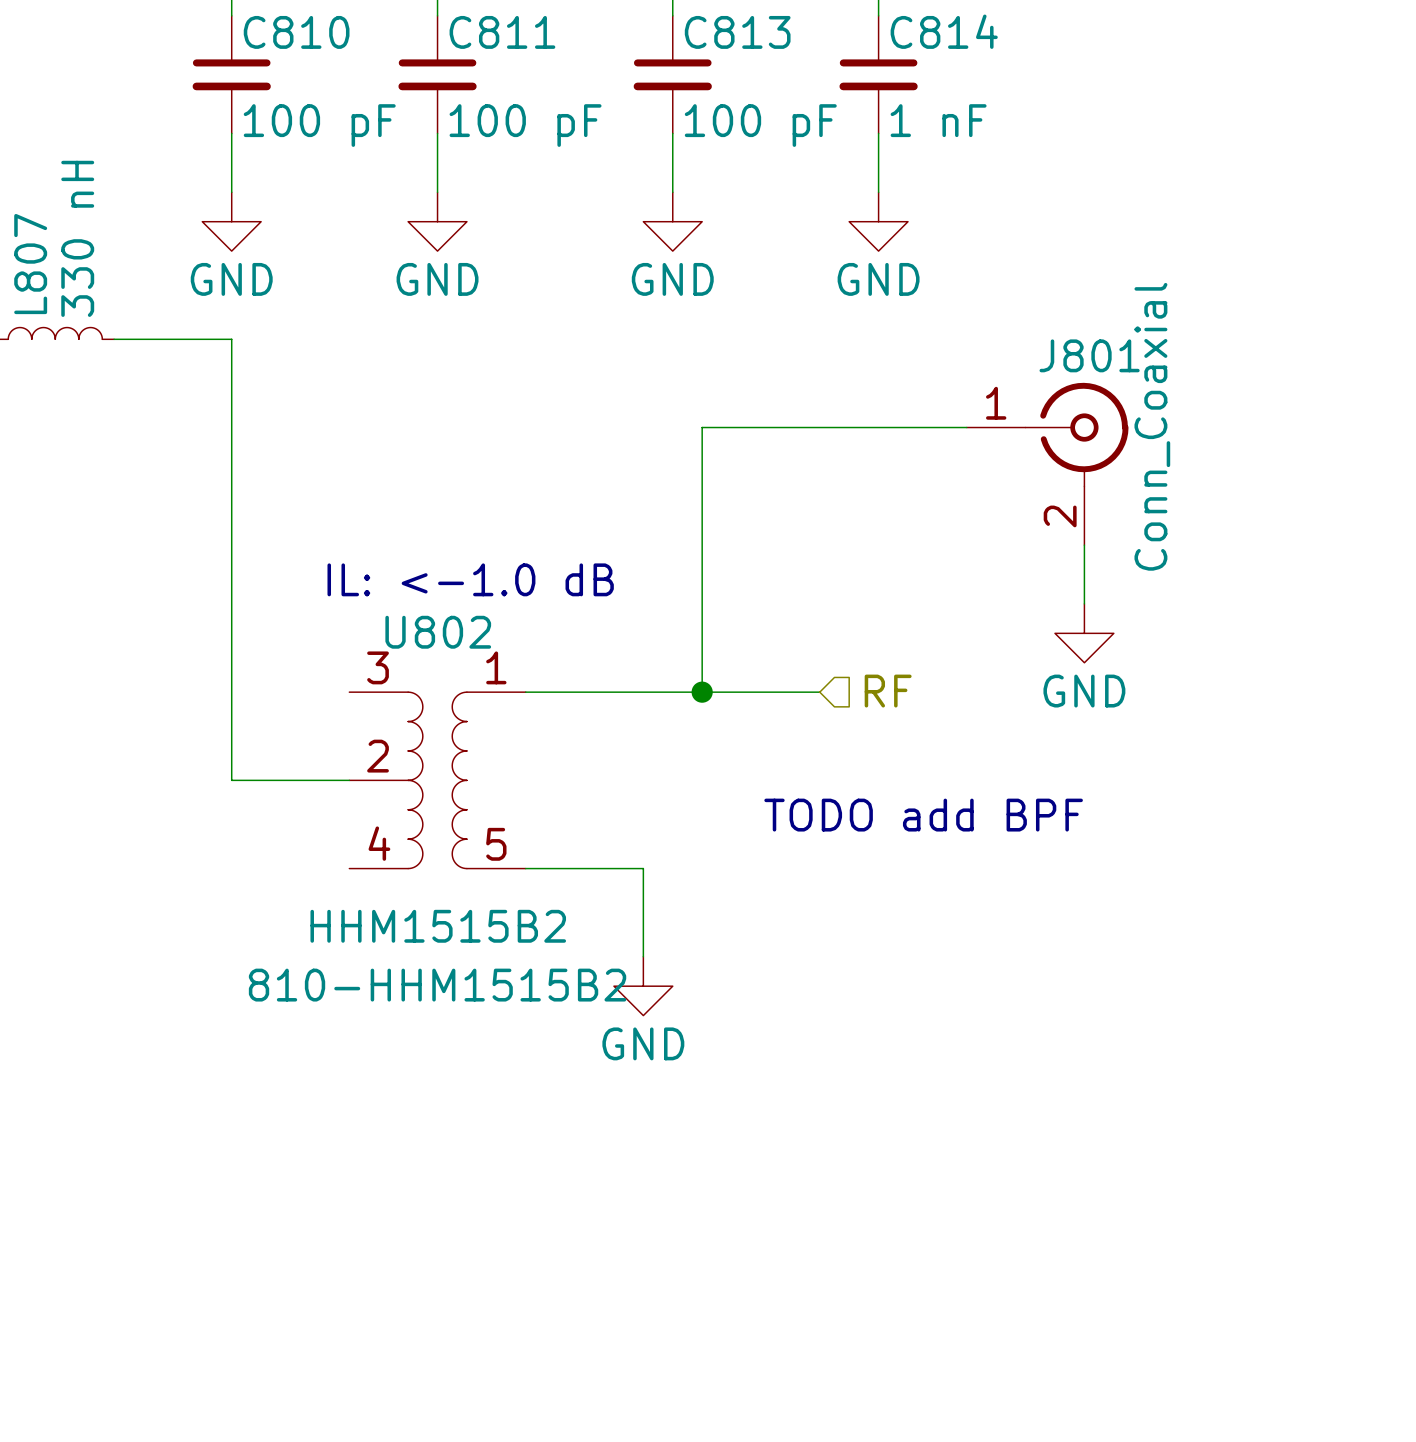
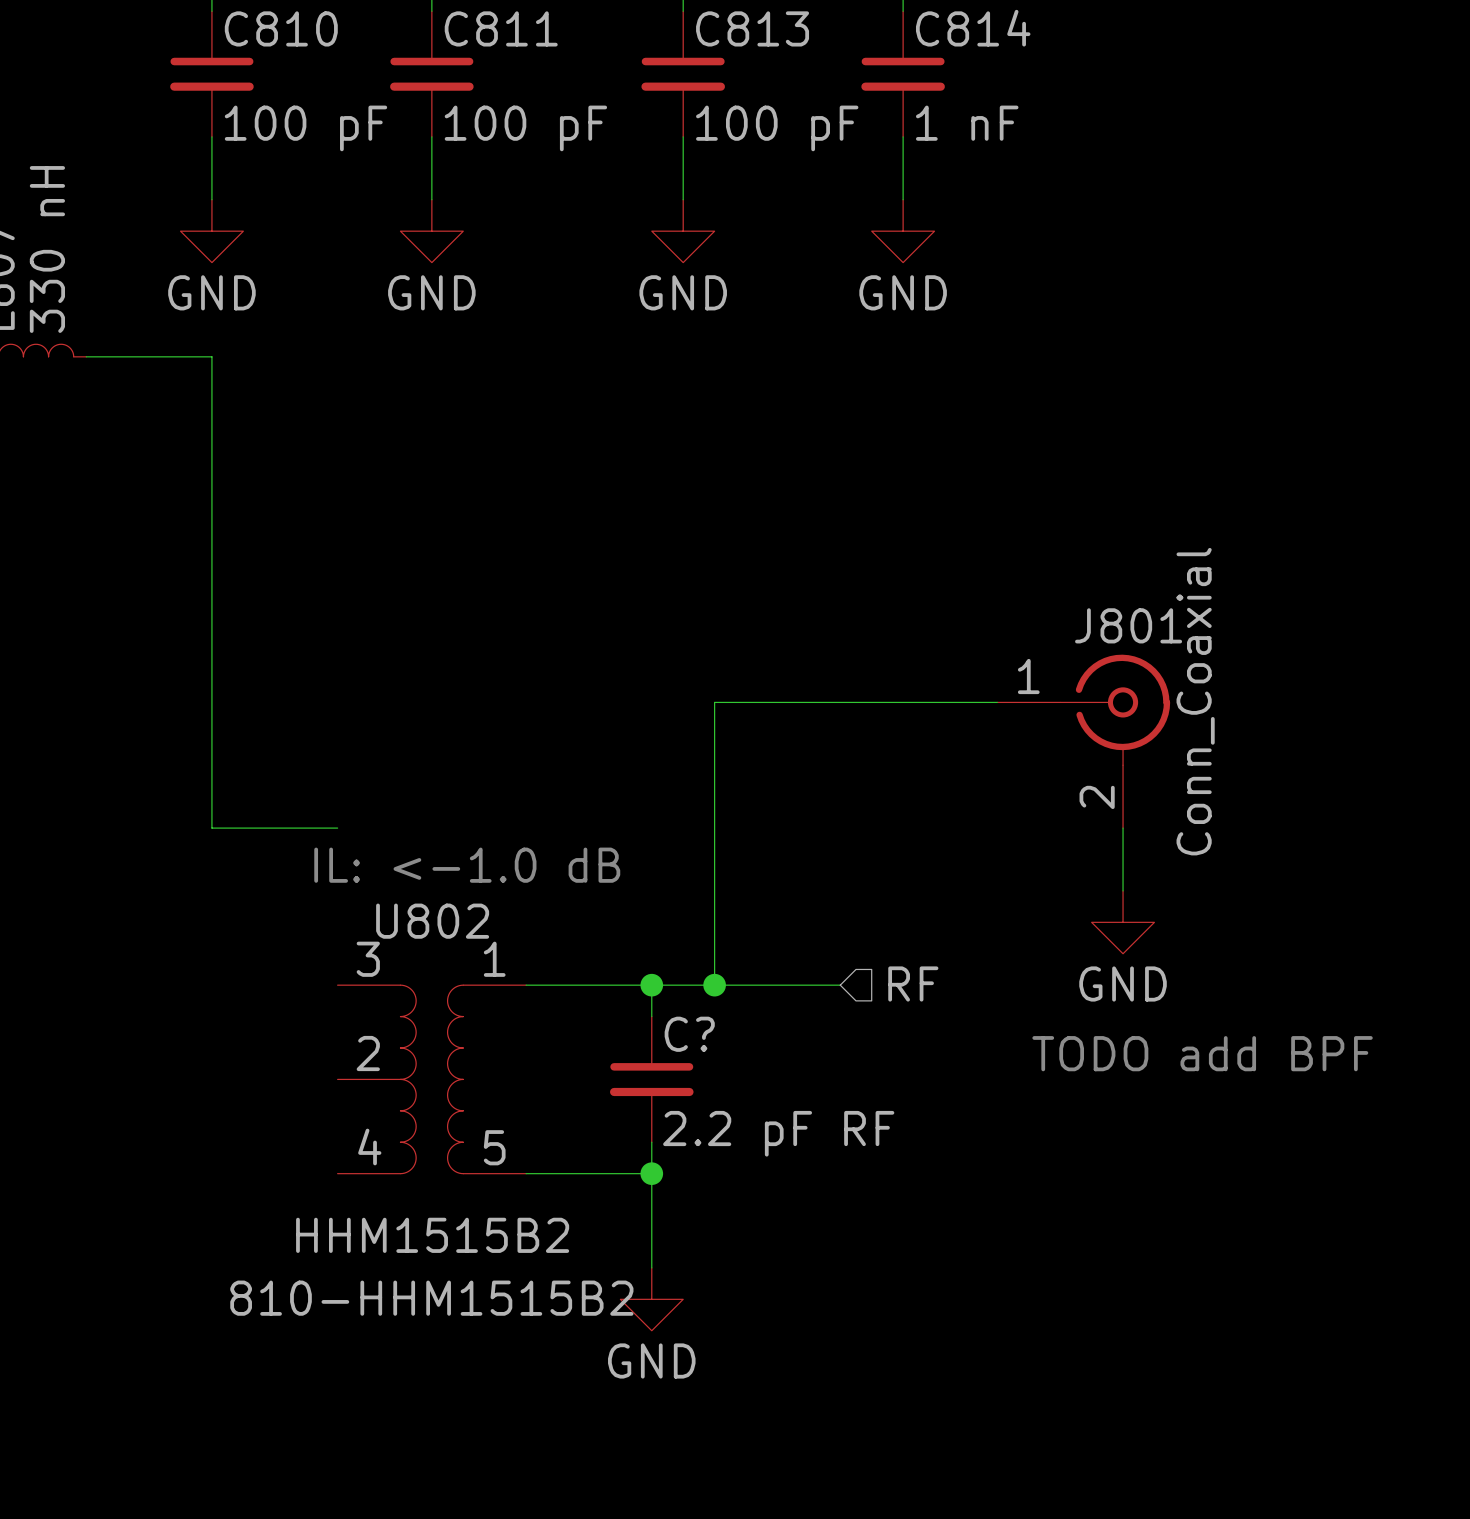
wire: (966, 427) (702, 427) (702, 662) -> (997, 702) (714, 702)
J801 position: (1047, 463) -> (1083, 741)
wire: (1084, 545) (1084, 603) -> (1123, 828) (1123, 890)
text position: IL: <-1.0 dB (470, 579) -> IL: <-1.0 dB (467, 865)
power symbol: GND (1084, 633) -> none
hierarchical label position: RF (888, 691) -> RF (913, 983)
wire: (525, 692) (819, 692) -> (526, 985) (840, 985)
wire: none -> (714, 733) (714, 985)
junction: (702, 692) -> none
U802 position: (437, 780) -> (431, 1079)
text position: TODO add BPF (923, 815) -> TODO add BPF (1202, 1053)
wire: (525, 868) (643, 868) (643, 927) -> none
power symbol: none -> GND (1123, 922)
junction: none -> (651, 985)
junction: none -> (714, 985)
power symbol: GND (643, 986) -> none
C?: none -> 2.2 pF RF (651, 1079)
wire: none -> (651, 1142) (651, 1267)
wire: none -> (526, 1173) (651, 1173)
junction: none -> (651, 1173)
power symbol: none -> GND (651, 1299)

